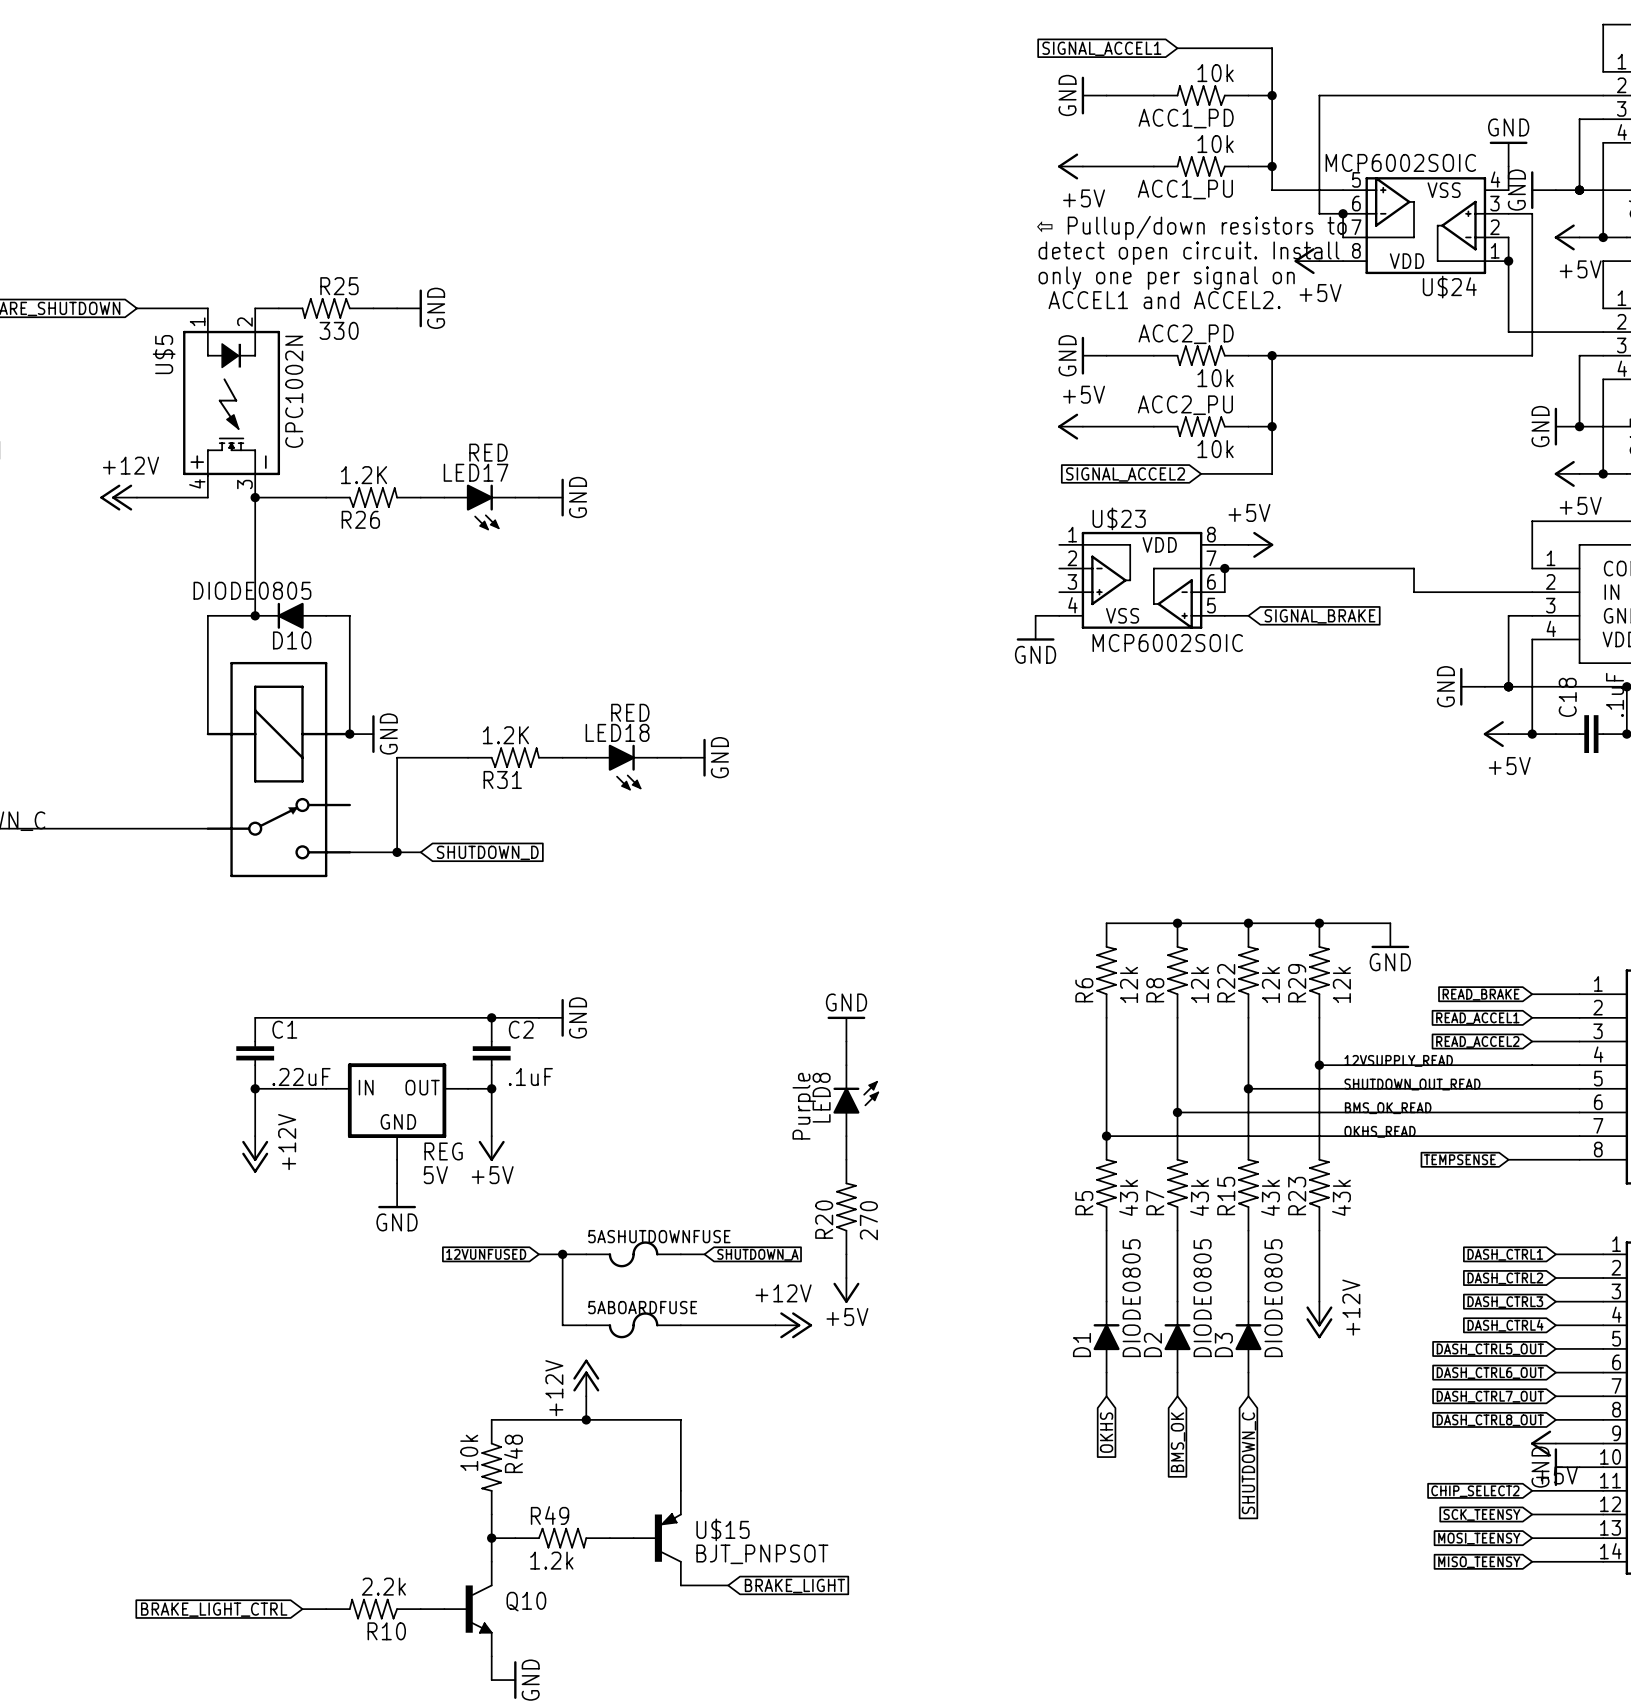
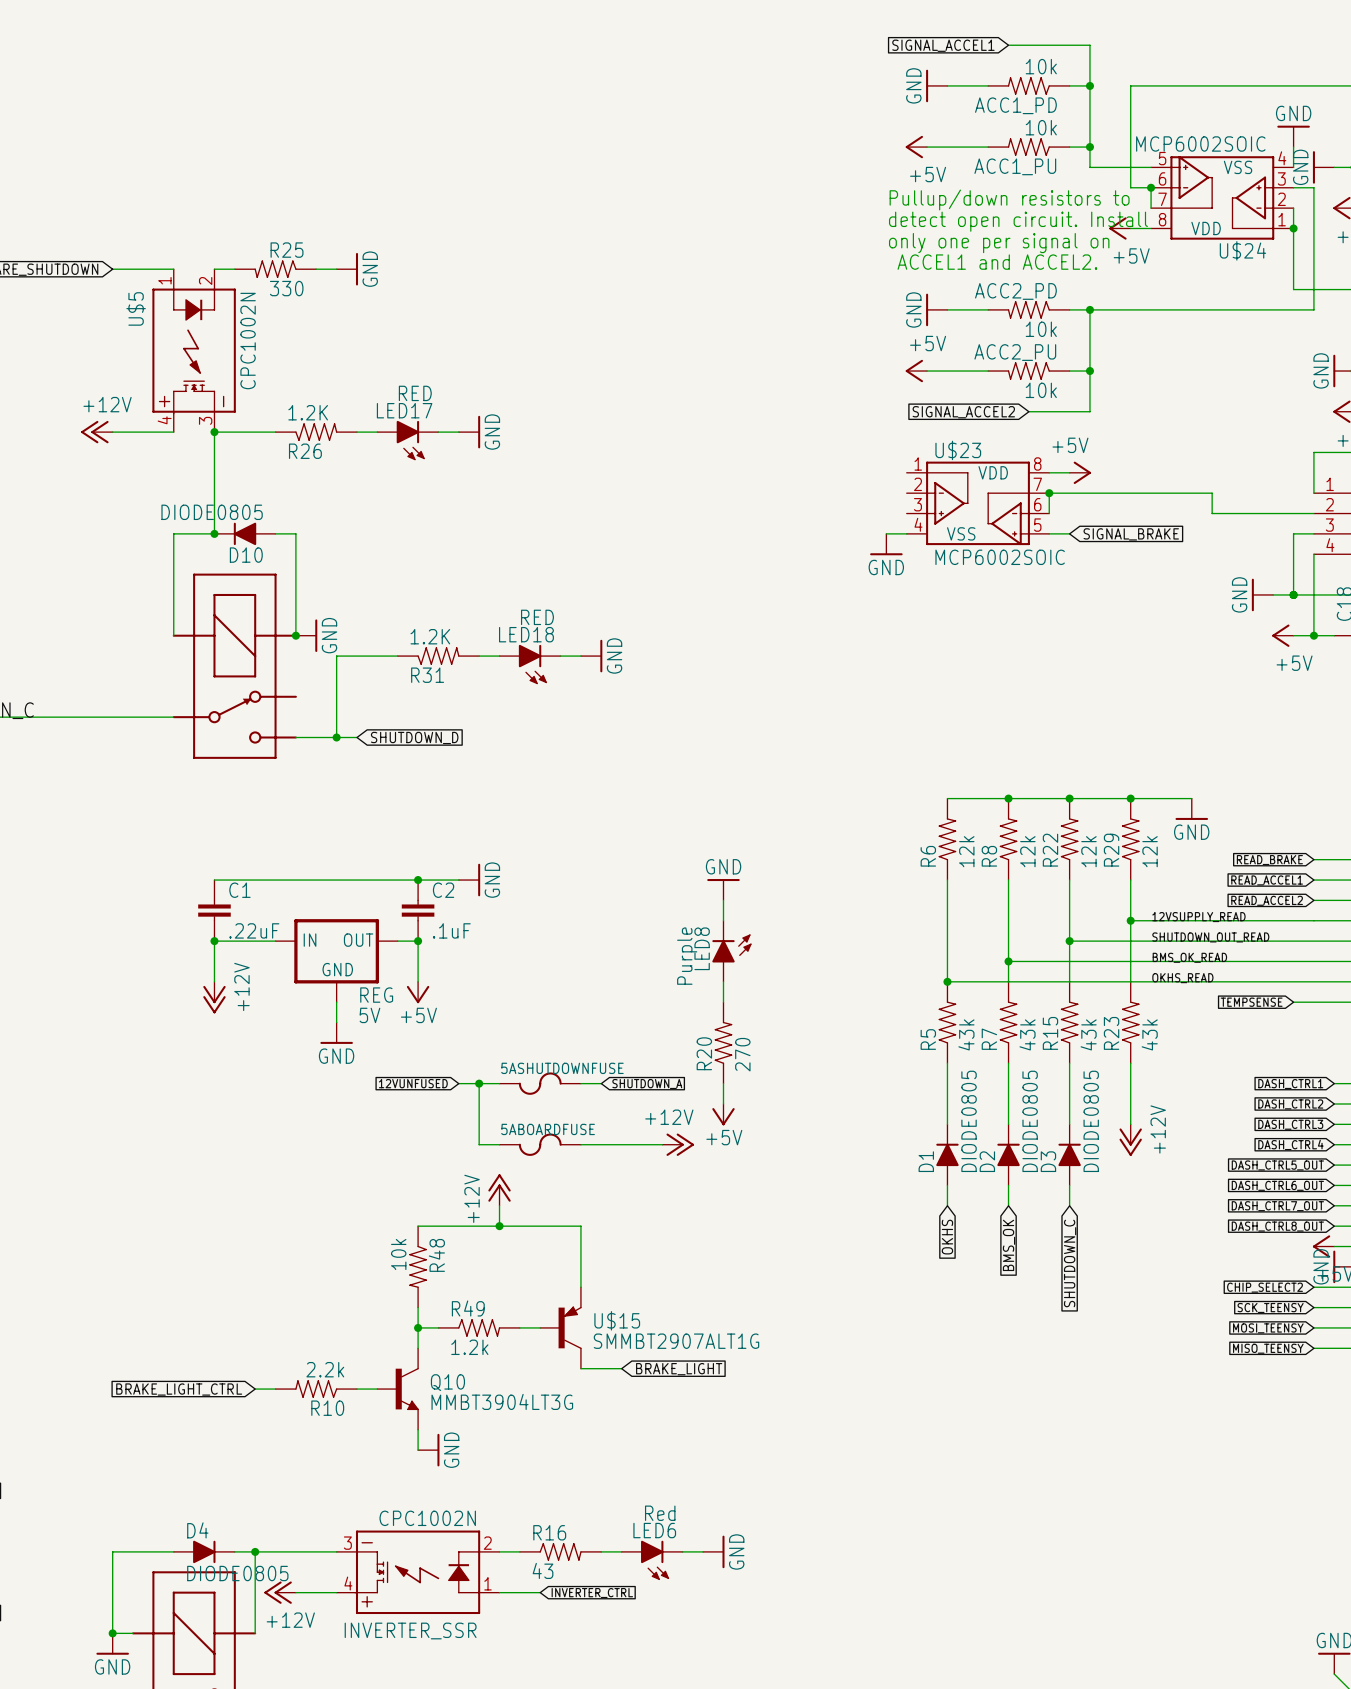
text: ⇦ Pullup/down resistors to (1191, 227) -> Pullup/down resistors to (1009, 199)
U$15 value: BJT_PNPSOT (762, 1554) -> SMMBT2907ALT1G (676, 1341)
Q10 value: none -> MMBT3904LT3G (502, 1401)

